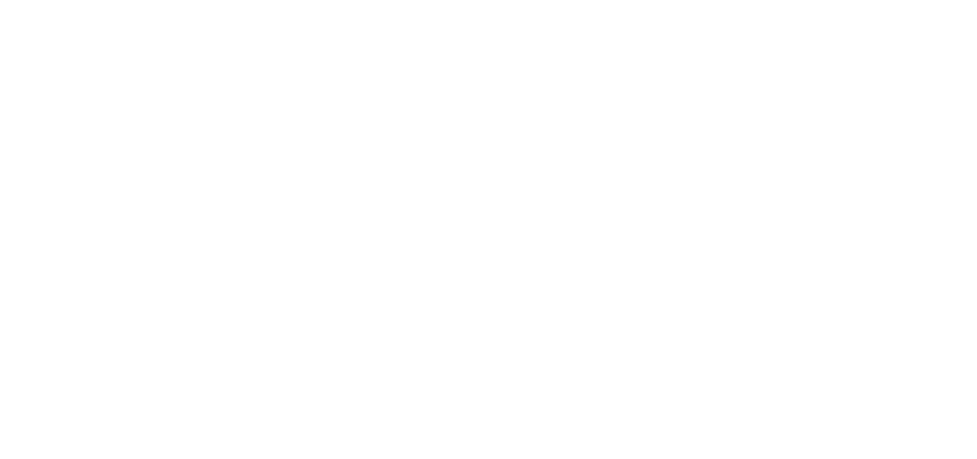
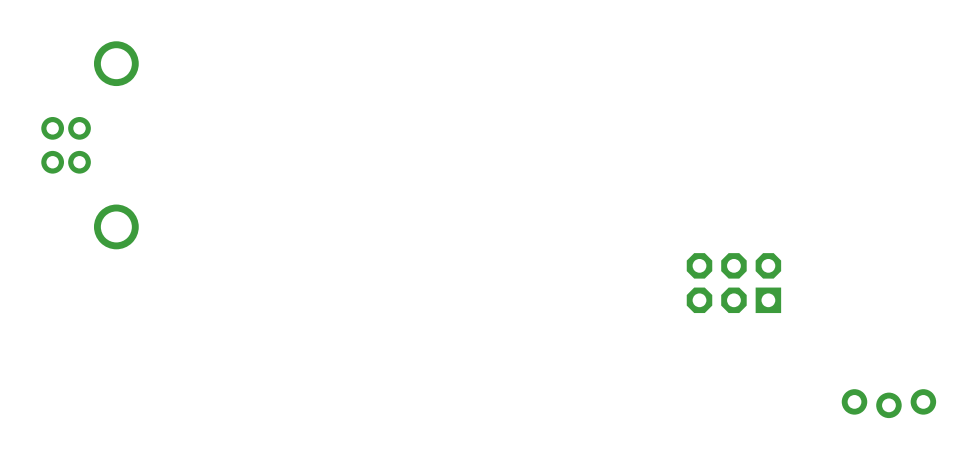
part: none -> (90, 145)
part: none -> (733, 283)
part: none -> (888, 403)

